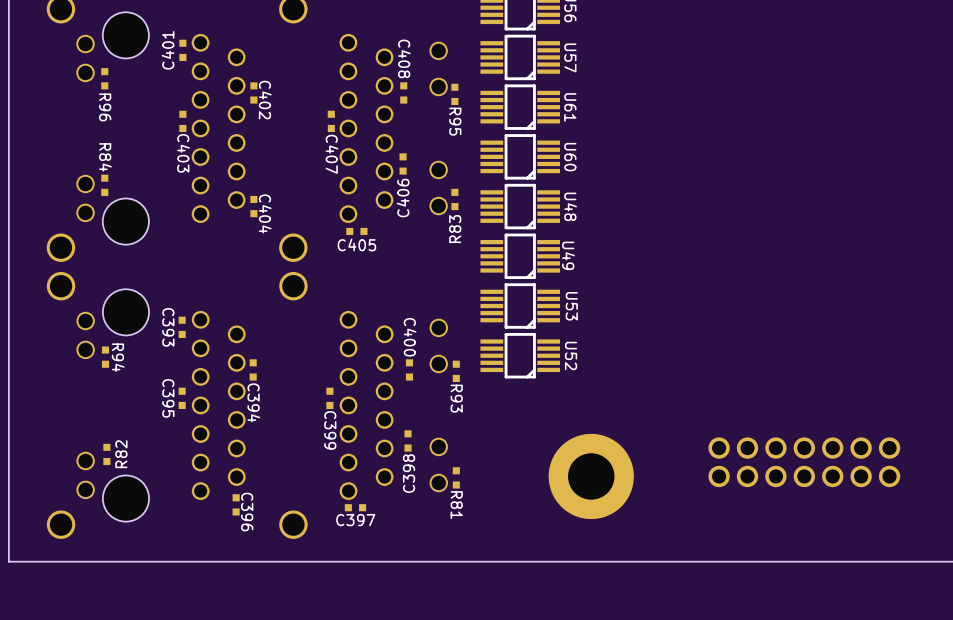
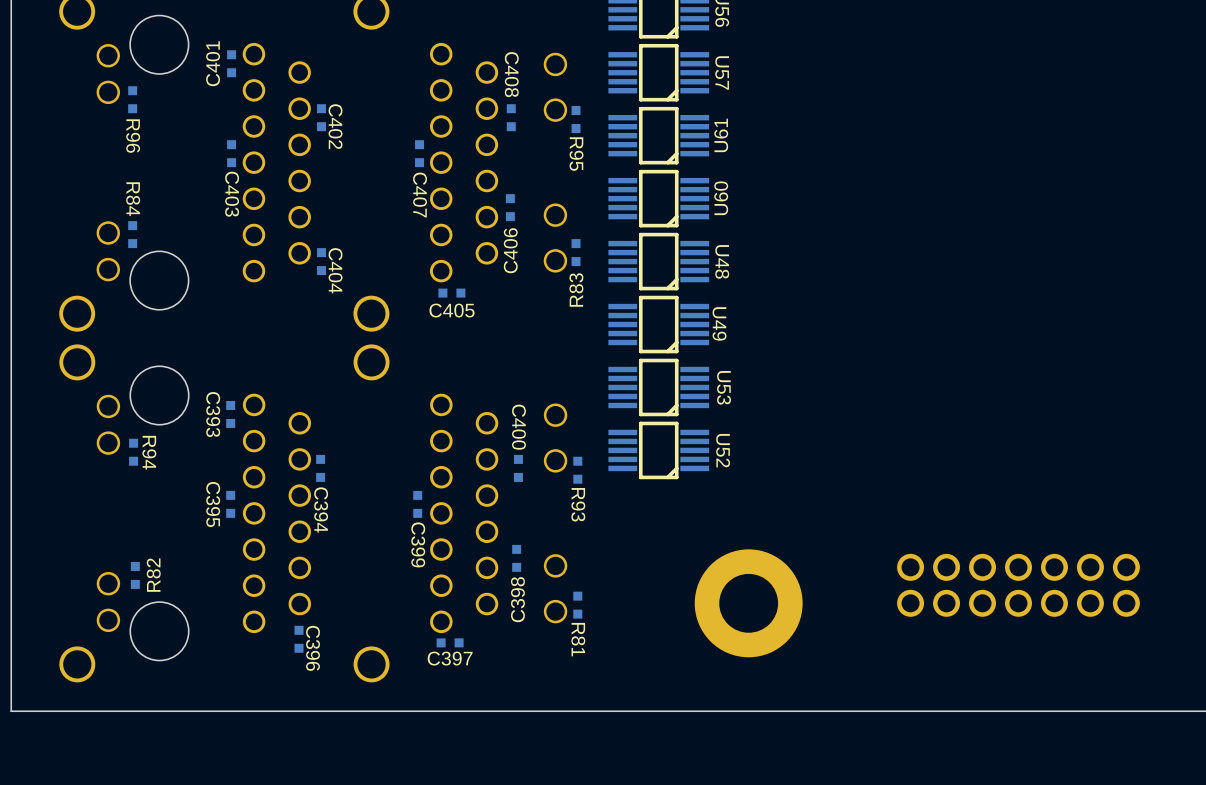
U61 name rotation: 0° (570, 107) -> 180° (721, 135)
U60 name rotation: 0° (570, 157) -> 180° (721, 198)

